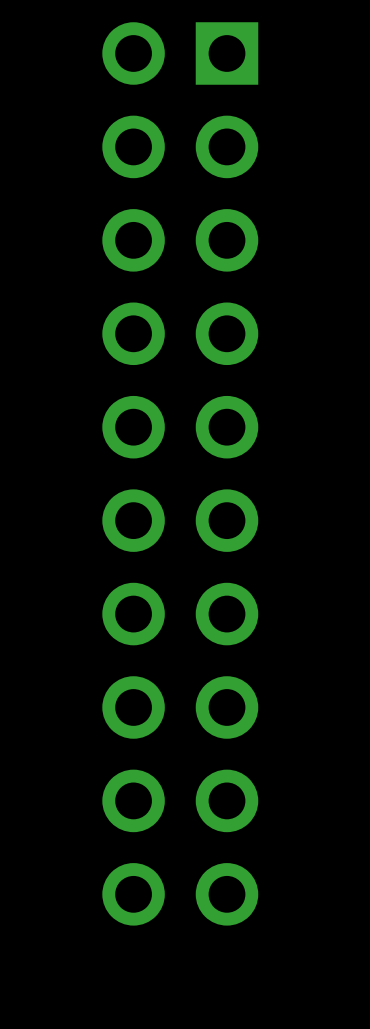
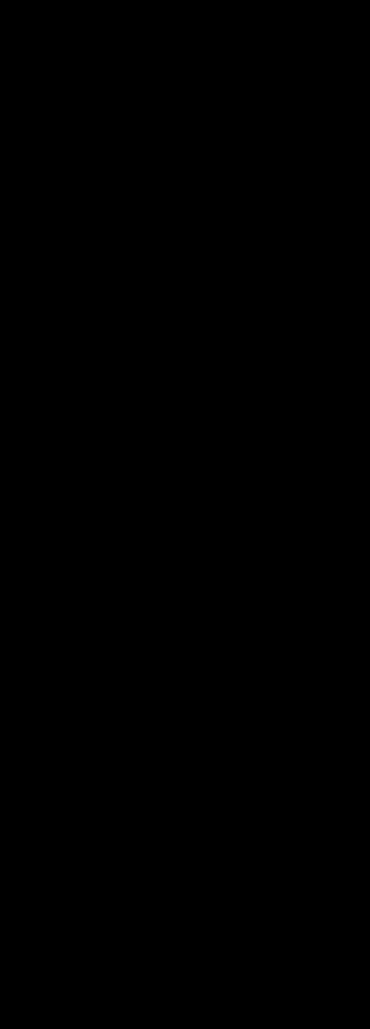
part: (180, 473) -> none

